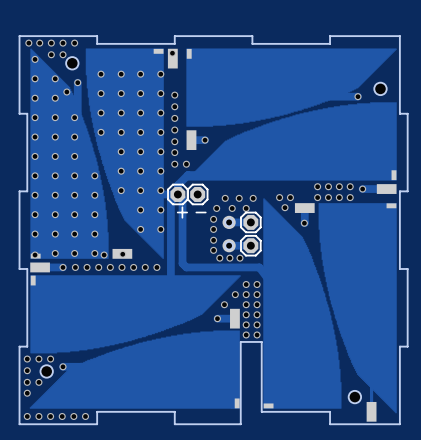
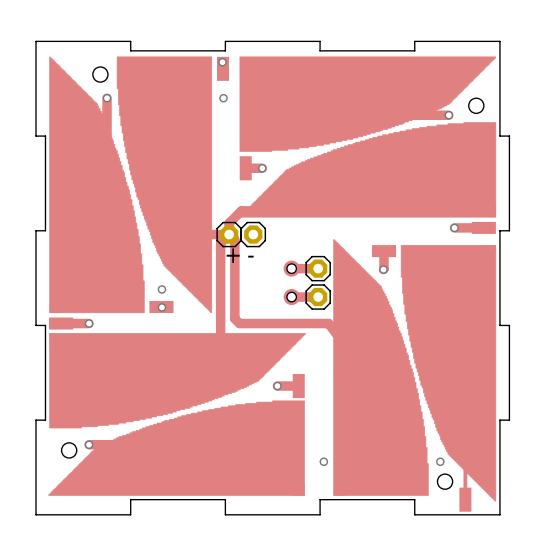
via: (28, 43) -> none
via: (39, 43) -> none
via: (51, 43) -> none
via: (62, 43) -> none
via: (74, 43) -> none
via: (51, 54) -> none
via: (62, 54) -> none
via: (35, 59) -> none
via: (101, 74) -> none
via: (121, 74) -> none
via: (140, 74) -> none
via: (160, 74) -> none
via: (35, 78) -> none
via: (55, 78) -> none
via: none -> (223, 98)
via: (66, 92) -> none
via: (101, 93) -> none
via: (121, 93) -> none
via: (140, 93) -> none
via: (160, 93) -> none
via: (174, 95) -> none
via: (35, 98) -> none
via: (55, 98) -> none
via: (174, 106) -> none
via: (101, 112) -> none
via: (121, 112) -> none
via: (140, 112) -> none
via: (160, 112) -> none
via: (35, 117) -> none
via: (55, 117) -> none
via: (74, 117) -> none
via: (174, 118) -> none
via: (174, 130) -> none
via: (101, 132) -> none
via: (121, 132) -> none
via: (140, 132) -> none
via: (160, 132) -> none
via: (35, 137) -> none
via: (55, 137) -> none
via: (74, 137) -> none
via: (174, 141) -> none
via: (121, 151) -> none
via: (140, 151) -> none
via: (160, 151) -> none
via: (174, 152) -> none
via: (35, 156) -> none
via: (55, 156) -> none
via: (74, 156) -> none
via: (174, 164) -> none
via: (186, 164) -> none
via: (121, 171) -> none
via: (140, 171) -> none
via: (160, 171) -> none
via: (35, 175) -> none
via: (55, 175) -> none
via: (74, 175) -> none
via: (94, 175) -> none
via: (317, 186) -> none
via: (328, 186) -> none
via: (339, 186) -> none
via: (350, 186) -> none
via: (121, 190) -> none
via: (140, 190) -> none
via: (160, 190) -> none
via: (35, 195) -> none
via: (55, 195) -> none
via: (74, 195) -> none
via: (94, 195) -> none
via: (279, 197) -> none
via: (290, 197) -> none
via: (317, 197) -> none
via: (328, 197) -> none
via: (339, 197) -> none
via: (350, 197) -> none
via: (225, 198) -> none
via: (239, 198) -> none
via: (253, 198) -> none
via: (285, 207) -> none
via: (216, 208) -> none
via: (232, 208) -> none
via: (246, 208) -> none
via: (140, 210) -> none
via: (160, 210) -> none
via: (35, 214) -> none
via: (55, 214) -> none
via: (74, 214) -> none
via: (94, 214) -> none
via: (213, 219) -> none
via: (140, 229) -> none
via: (160, 229) -> none
via: (213, 229) -> none
via: (35, 234) -> none
via: (55, 234) -> none
via: (74, 234) -> none
via: (94, 234) -> none
via: none -> (161, 289)
via: (213, 240) -> none
via: (213, 250) -> none
via: (55, 253) -> none
via: (74, 253) -> none
via: (94, 253) -> none
via: (35, 255) -> none
via: (104, 255) -> none
via: (219, 258) -> none
via: (229, 258) -> none
via: (239, 258) -> none
via: (75, 267) -> none
via: (87, 267) -> none
via: (98, 267) -> none
via: (110, 267) -> none
via: (121, 267) -> none
via: (133, 267) -> none
via: (145, 267) -> none
via: (156, 267) -> none
via: (246, 284) -> none
via: (257, 284) -> none
via: (235, 294) -> none
via: (246, 294) -> none
via: (257, 294) -> none
via: (224, 304) -> none
via: (246, 304) -> none
via: (257, 304) -> none
via: (246, 314) -> none
via: (257, 314) -> none
via: (246, 324) -> none
via: (257, 324) -> none
via: (246, 334) -> none
via: (257, 334) -> none
via: (27, 359) -> none
via: (38, 359) -> none
via: (50, 359) -> none
via: (27, 370) -> none
via: none -> (323, 461)
via: none -> (440, 461)
via: (27, 382) -> none
via: (38, 382) -> none
via: (27, 393) -> none
board edge: (261, 411) (261, 341) (240, 341) (240, 424) -> (331, 499) (320, 499) (320, 514) (305, 514)
via: (27, 416) -> none
via: (38, 416) -> none
via: (50, 416) -> none
via: (62, 416) -> none
via: (73, 416) -> none
via: (85, 416) -> none

